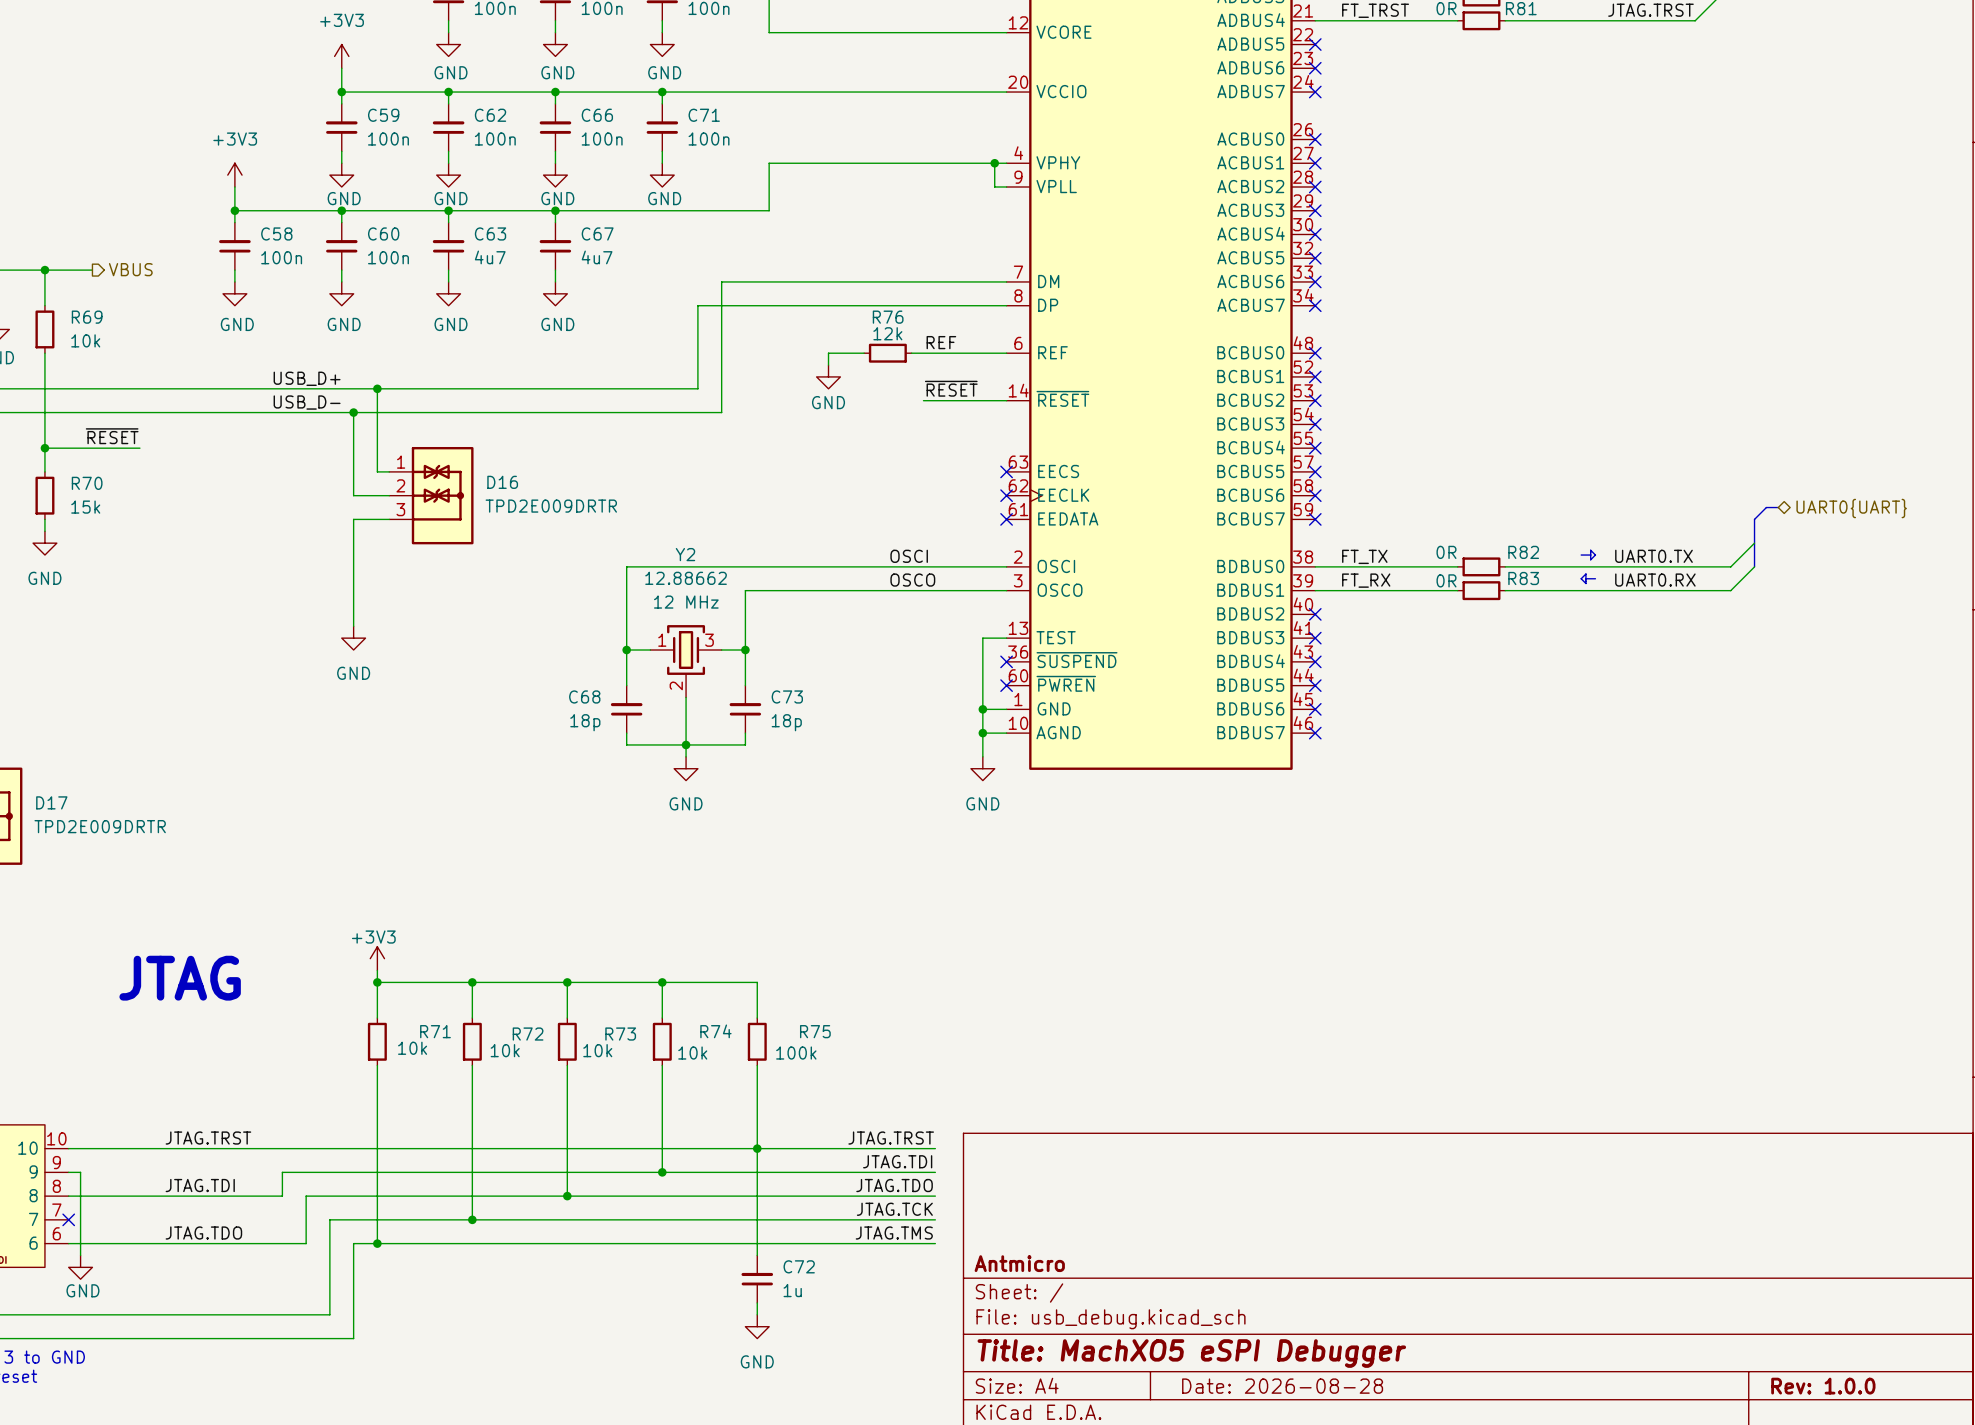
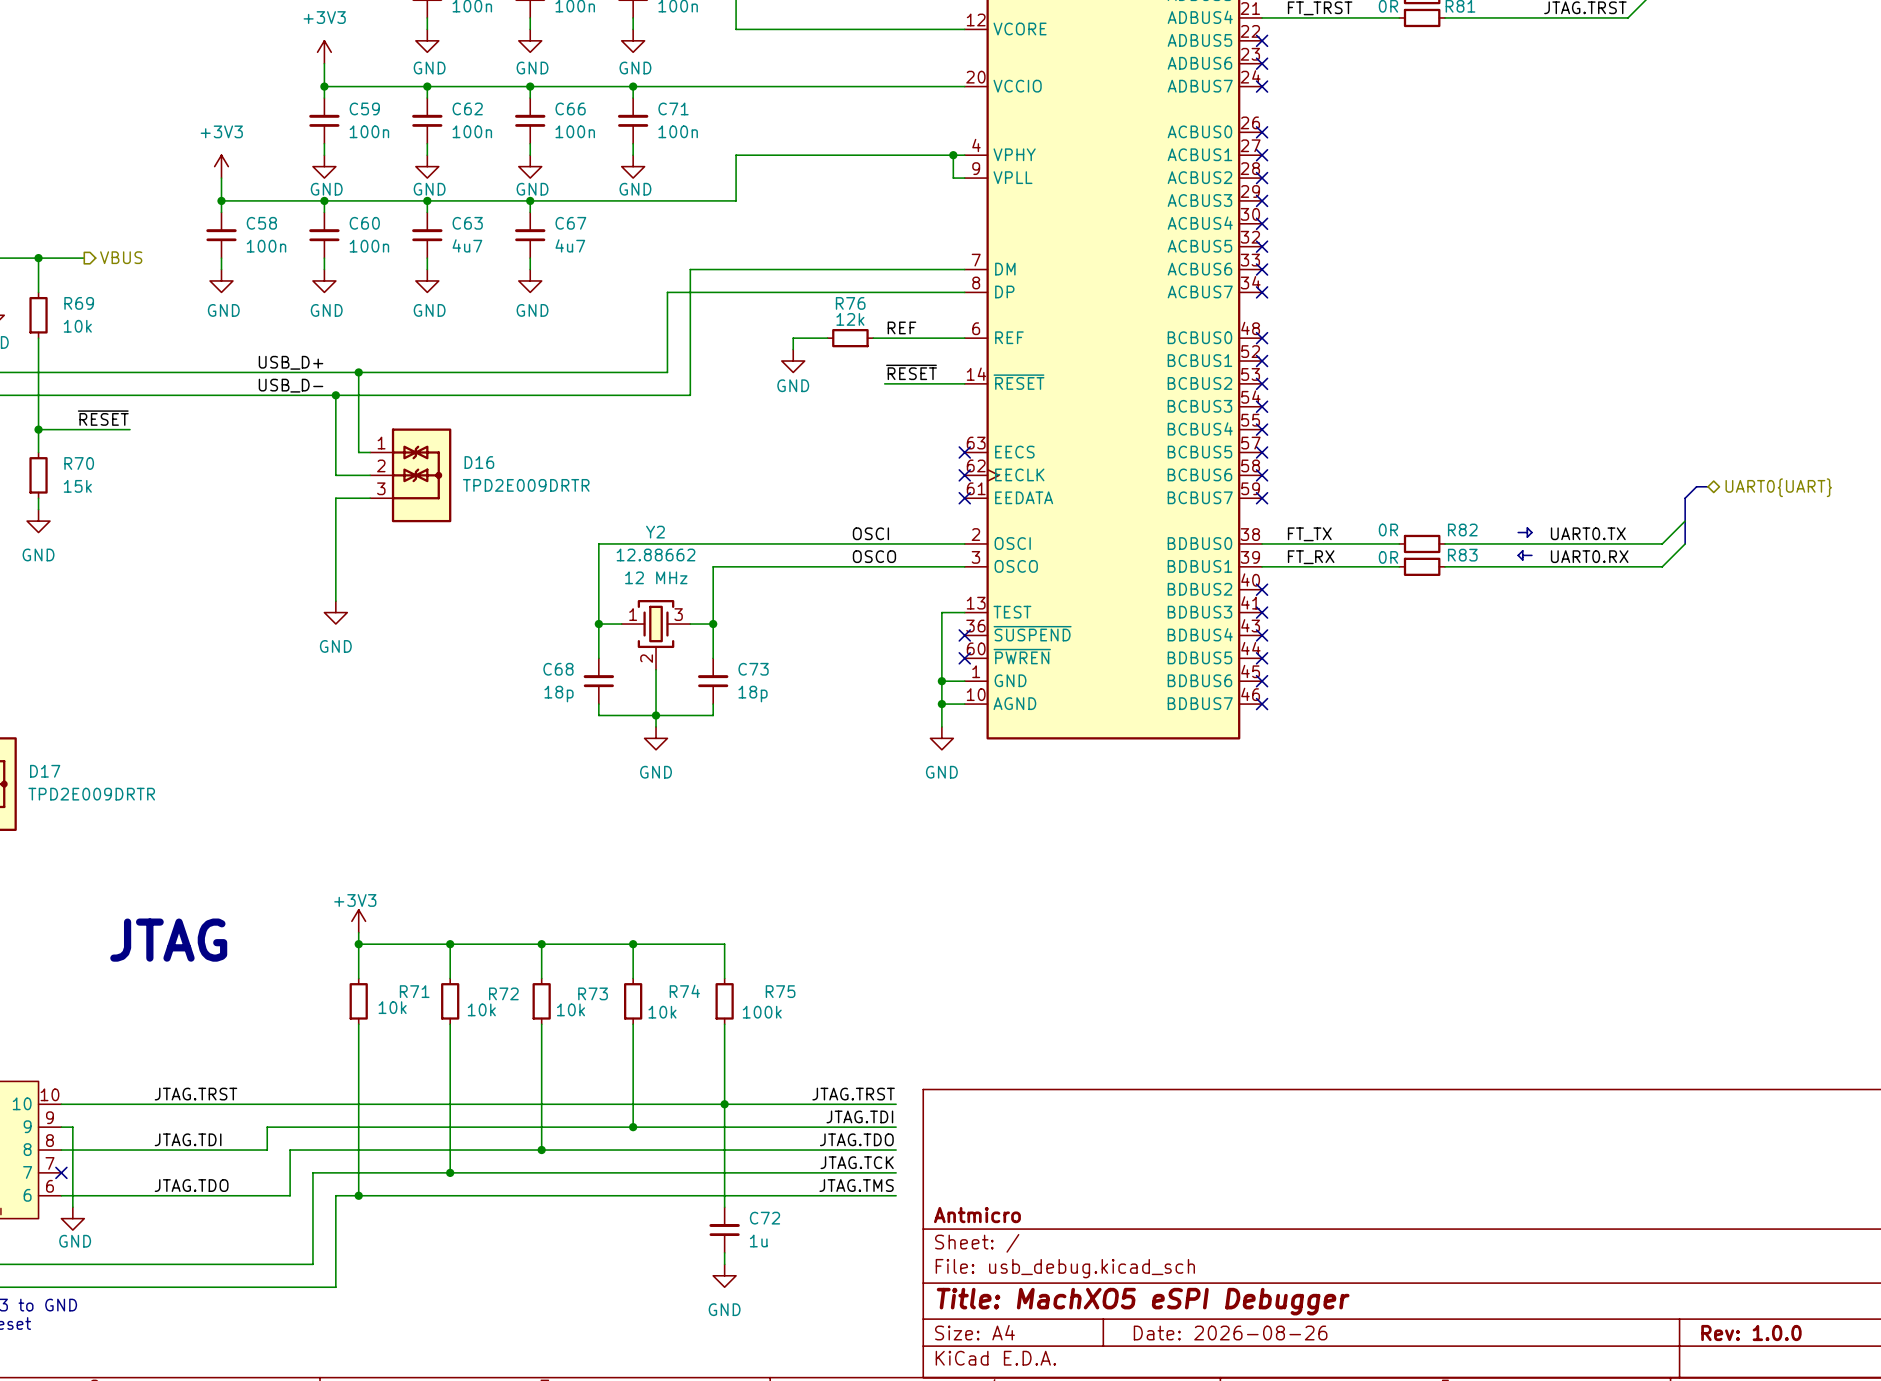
title block: Date: 2026-08-28 (1282, 1386) -> Date: 2026-08-26 (1230, 1333)

